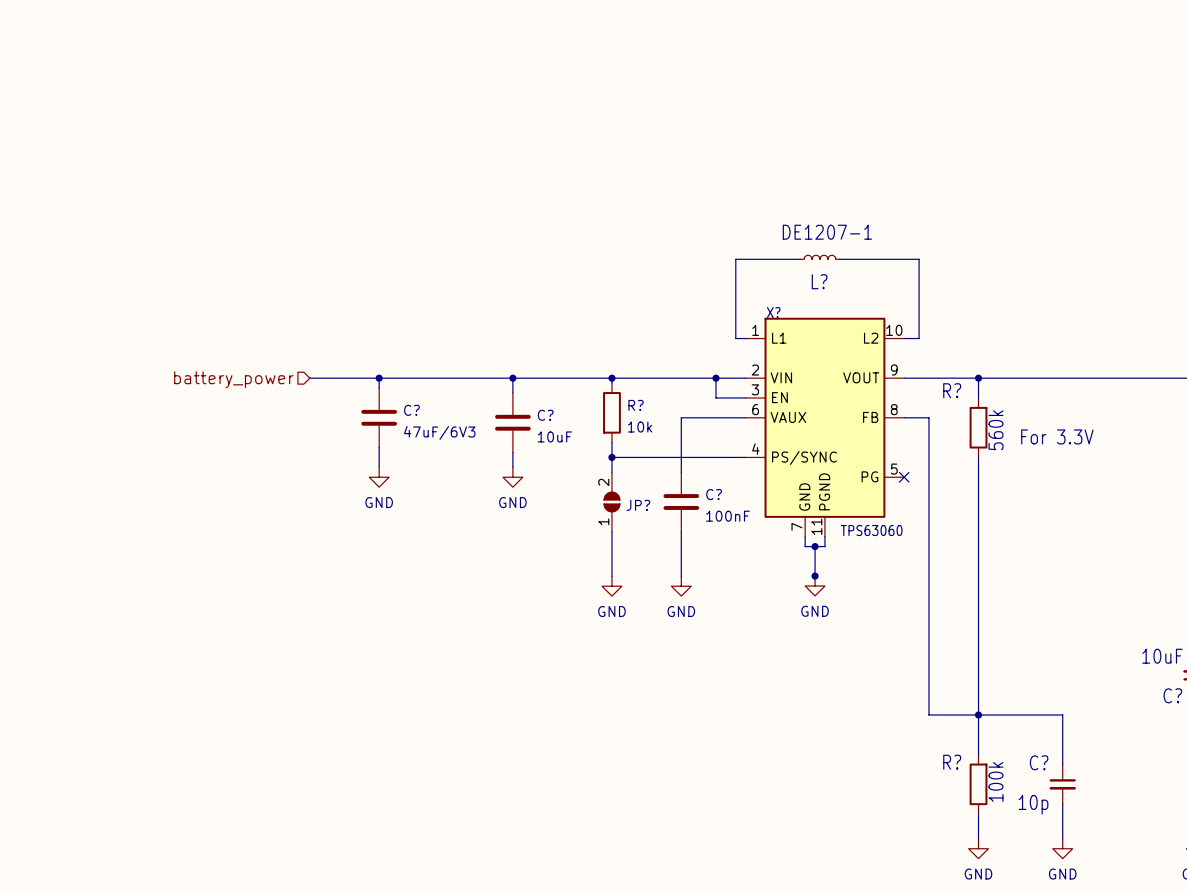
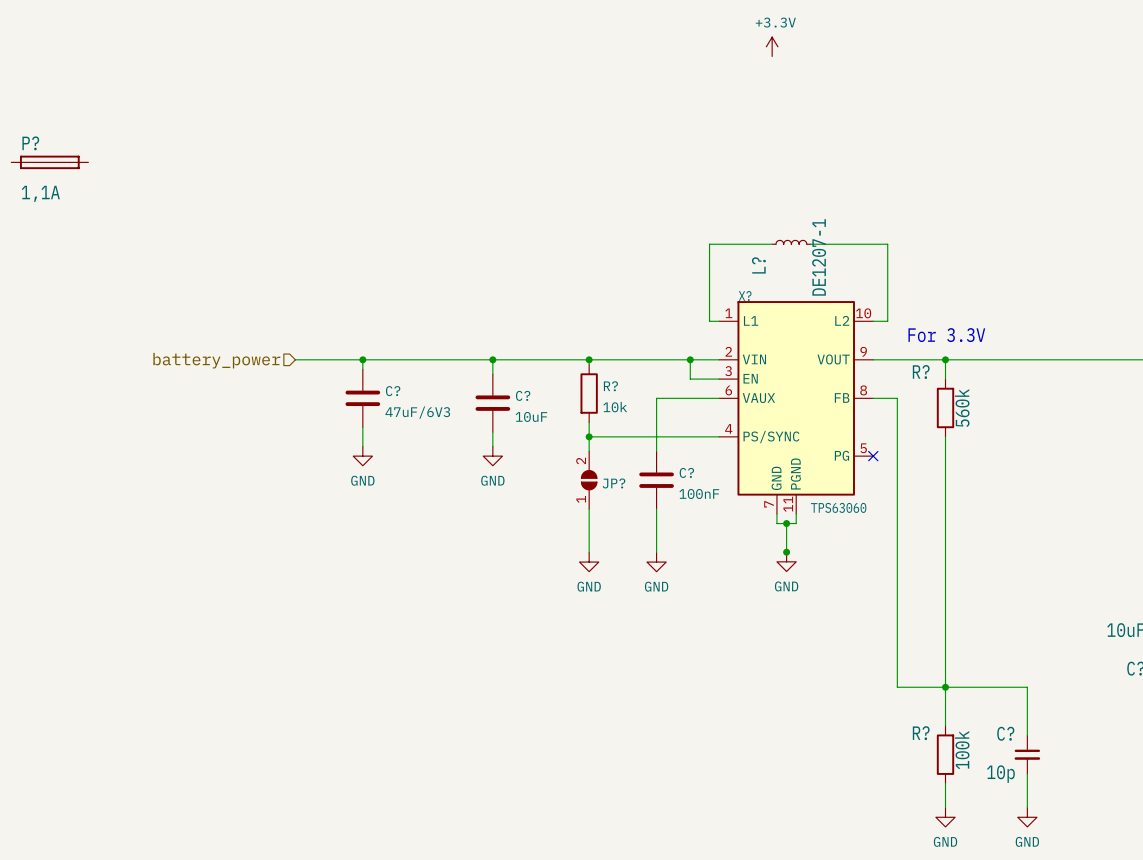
power symbol: none -> +3.3V (772, 46)
P?: none -> 1,1A (49, 162)
L? value rotation: 0° (827, 232) -> 90° counterclockwise (819, 257)
L? name rotation: 0° (819, 281) -> 90° counterclockwise (758, 265)
L? name position: L? (819, 281) -> L? (758, 265)
text position: For 3.3V (1057, 436) -> For 3.3V (946, 335)

